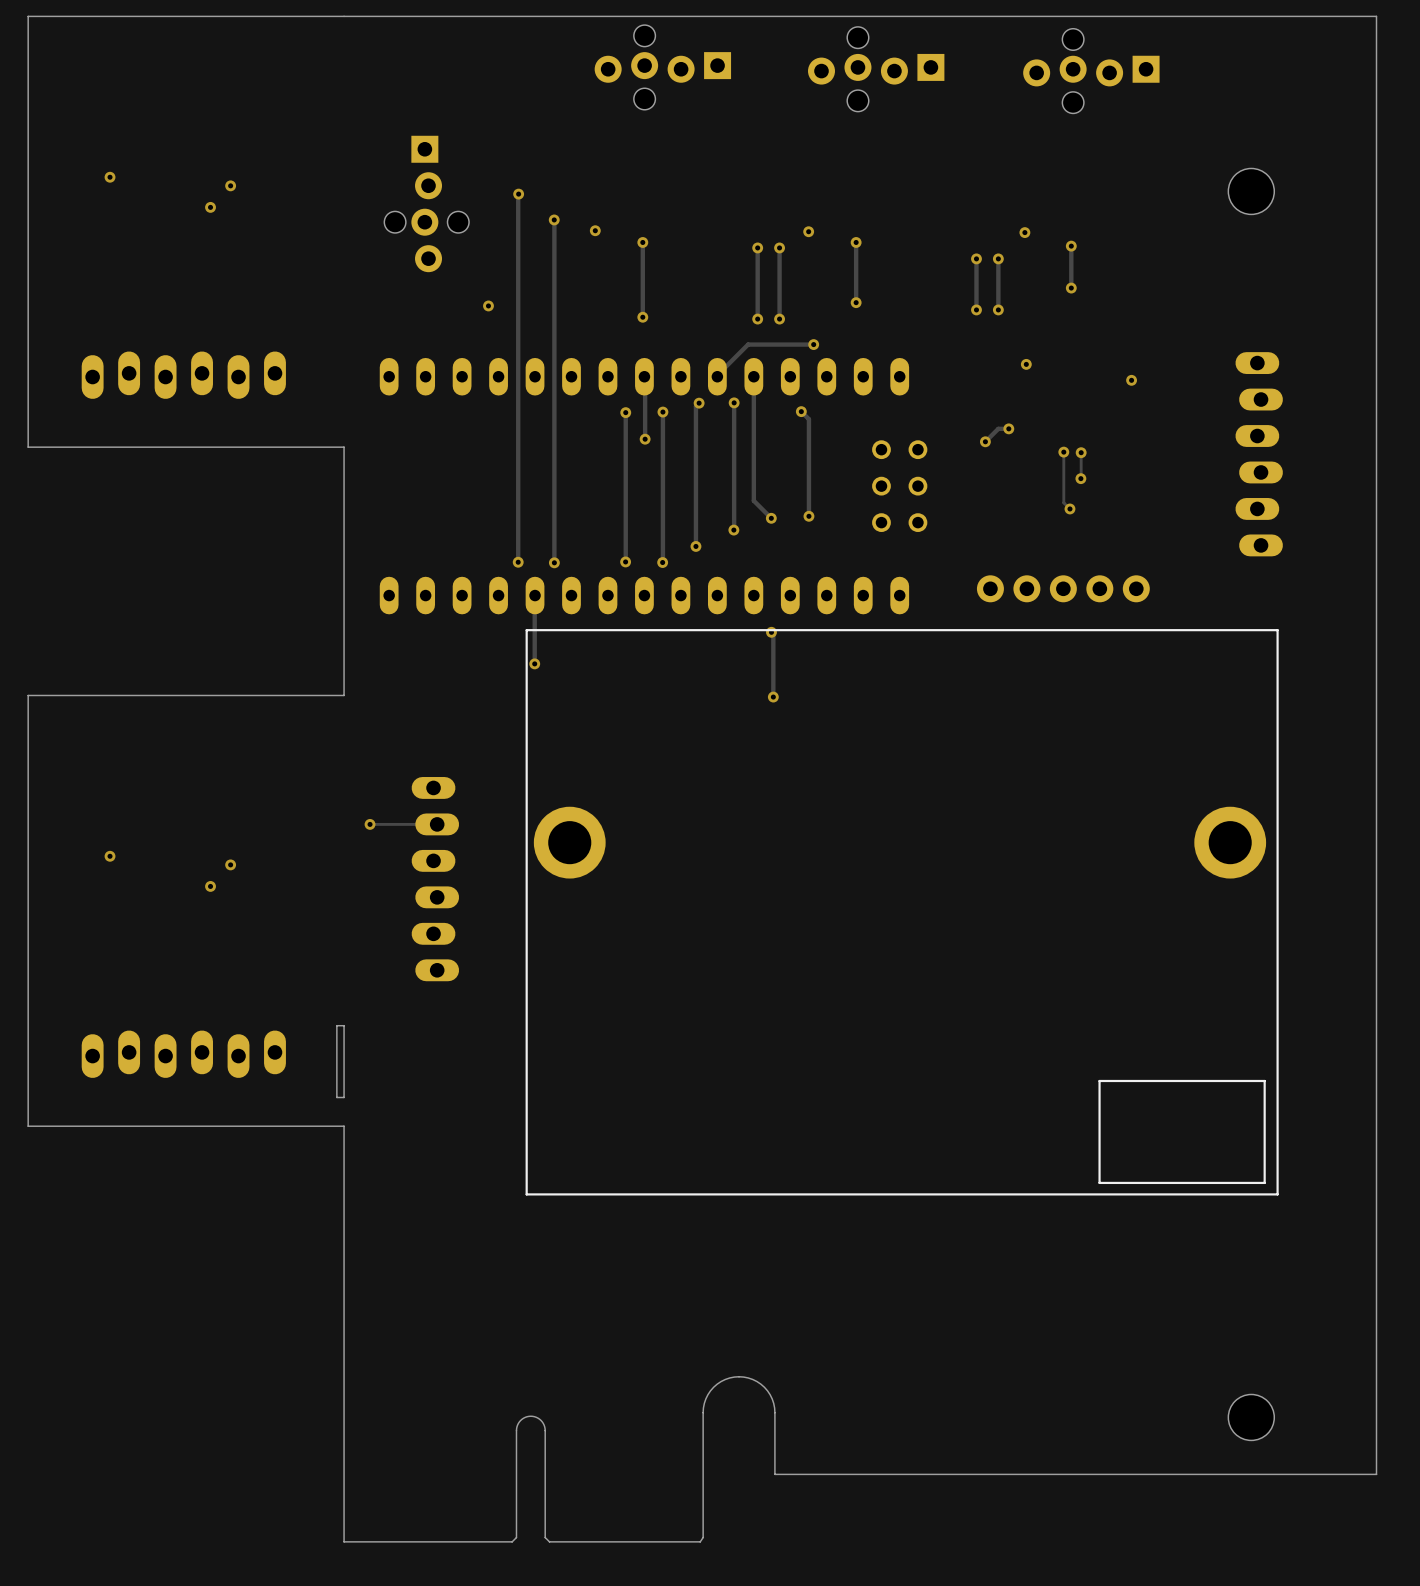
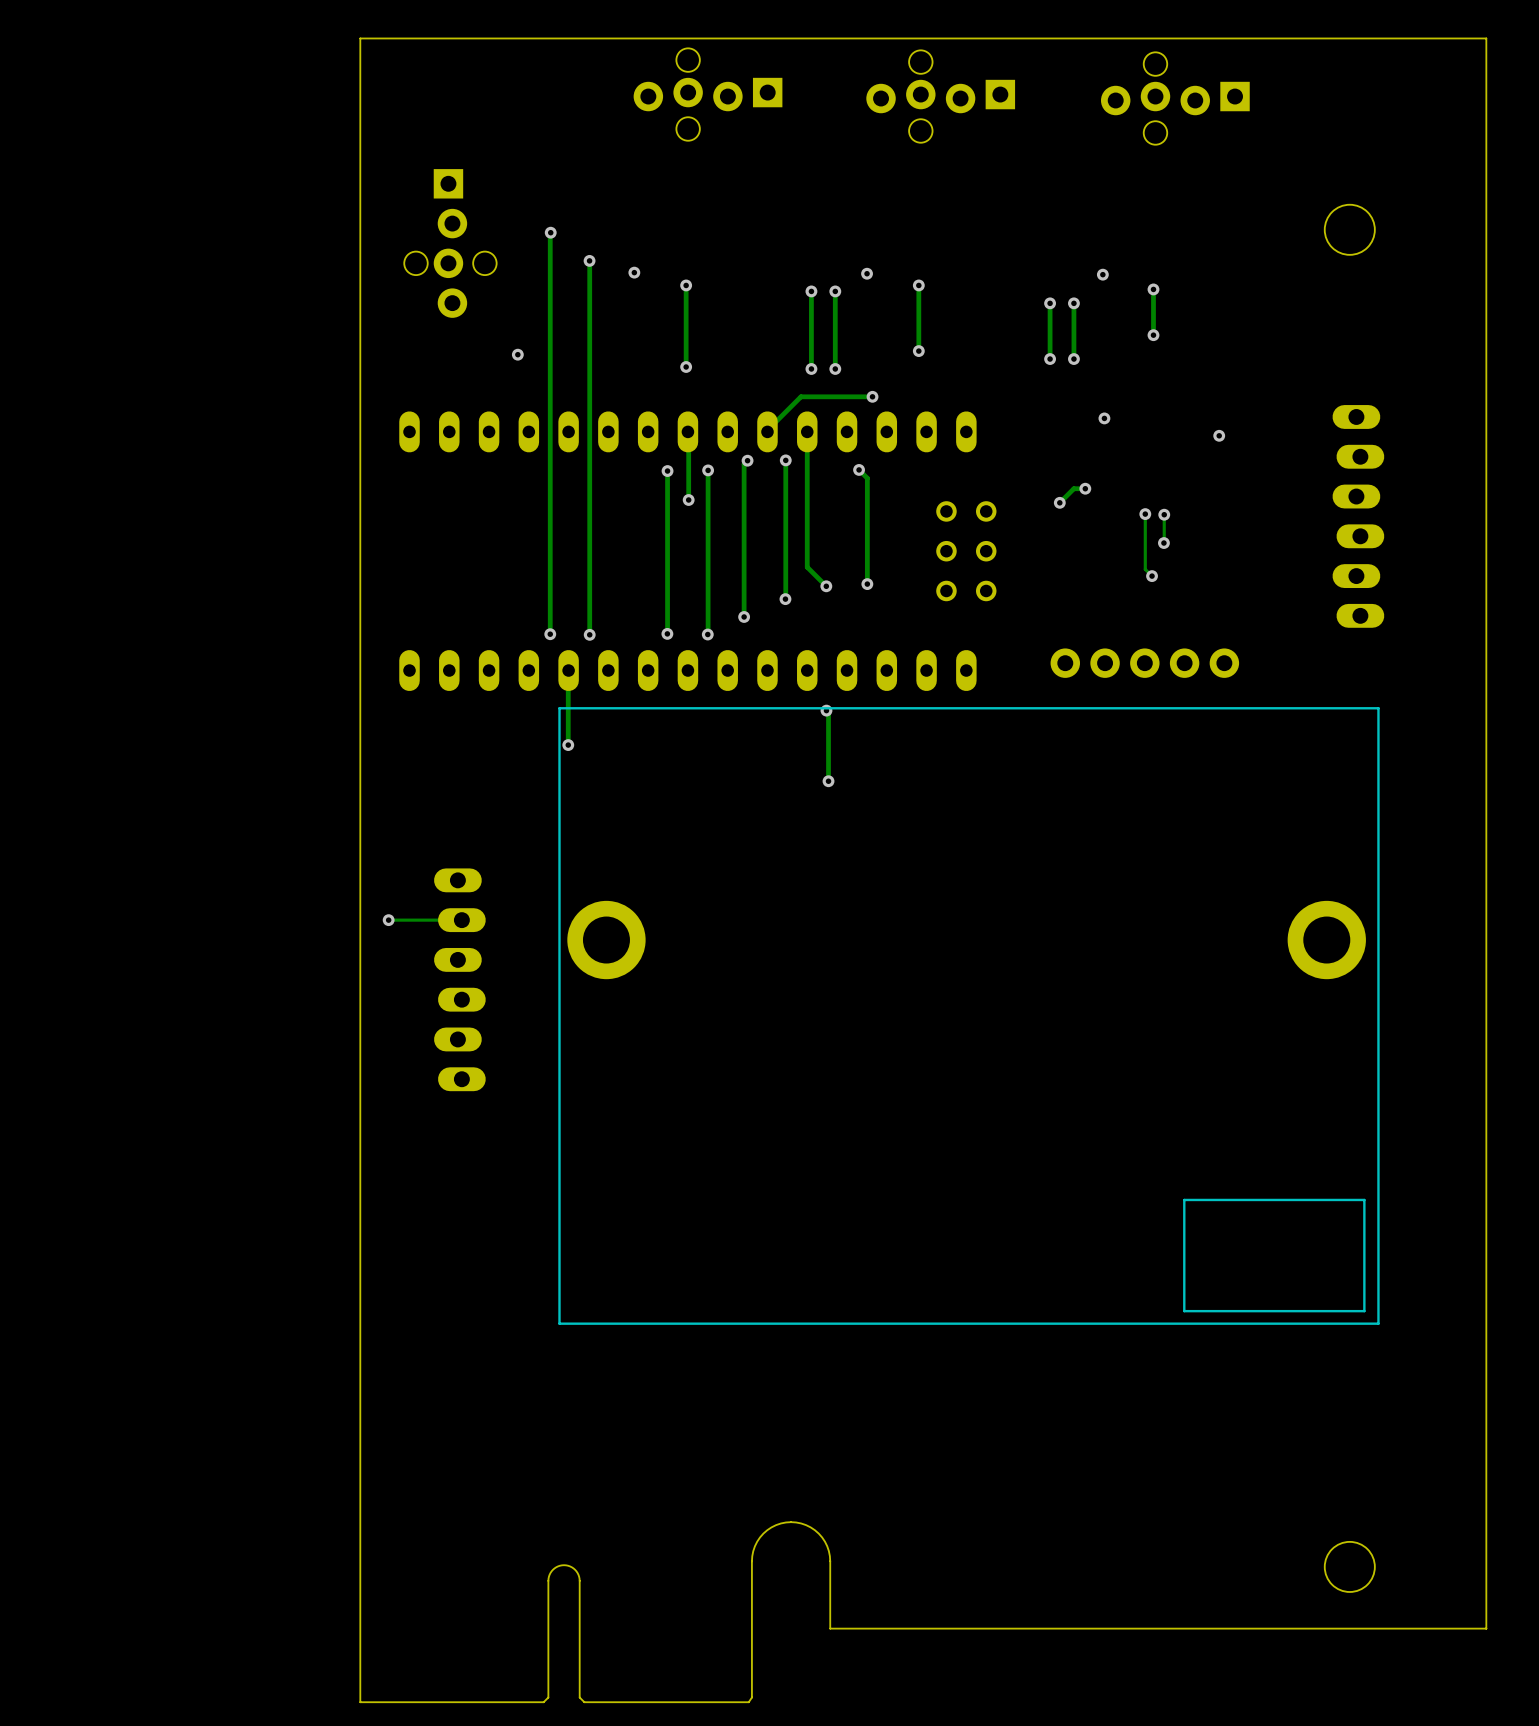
drawing: none -> [360, 38, 1487, 1703]
board edge: (1376, 16) (1376, 1474) (774, 1474) (774, 1412) (772, 1398) (764, 1387) (756, 1381) (739, 1376) (725, 1379) (717, 1384) (707, 1394) (704, 1403) (703, 1537) (700, 1541) (549, 1541) (545, 1537) (545, 1428) (539, 1419) (530, 1416) (522, 1419) (516, 1428) (516, 1537) (512, 1541) (344, 1541) (344, 1126) (28, 1126) (28, 695) (344, 695) (344, 447) (28, 447) (28, 16) (1376, 16) -> none
via: (110, 177) -> none
via: (230, 185) -> none
via: (210, 207) -> none
part: (183, 375) -> none
via: (110, 856) -> none
via: (230, 864) -> none
via: (210, 886) -> none
board edge: (344, 1025) (344, 1097) (336, 1097) (336, 1025) (344, 1025) -> none
part: (183, 1054) -> none

